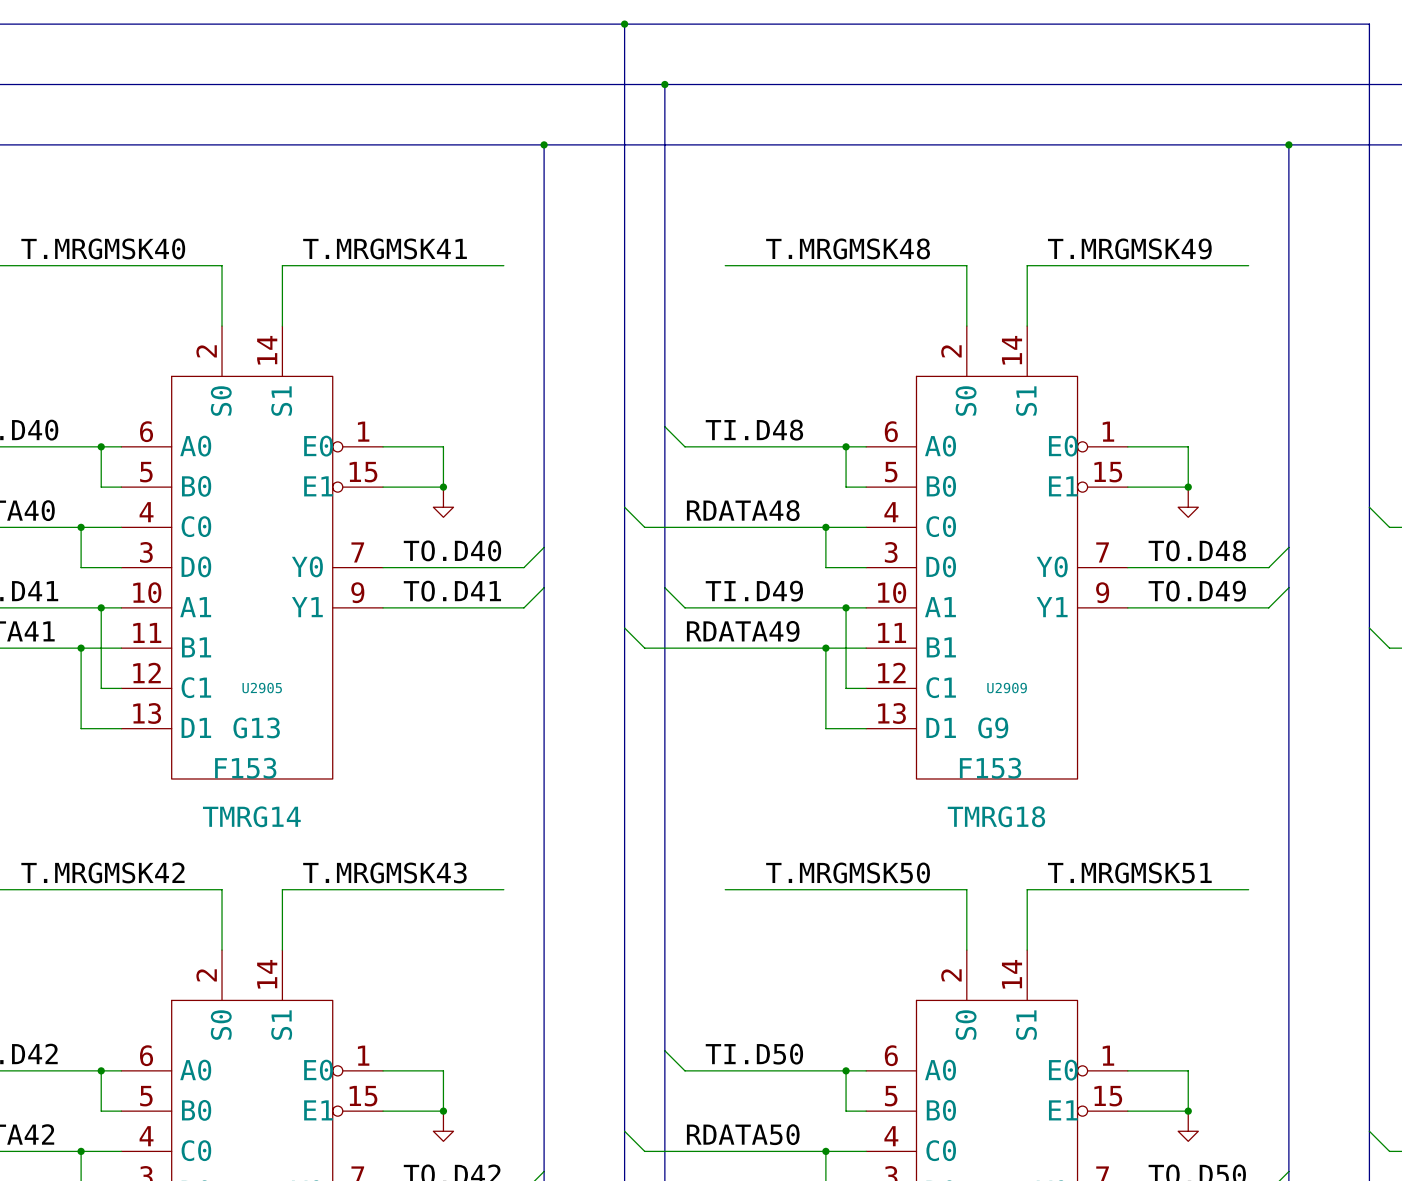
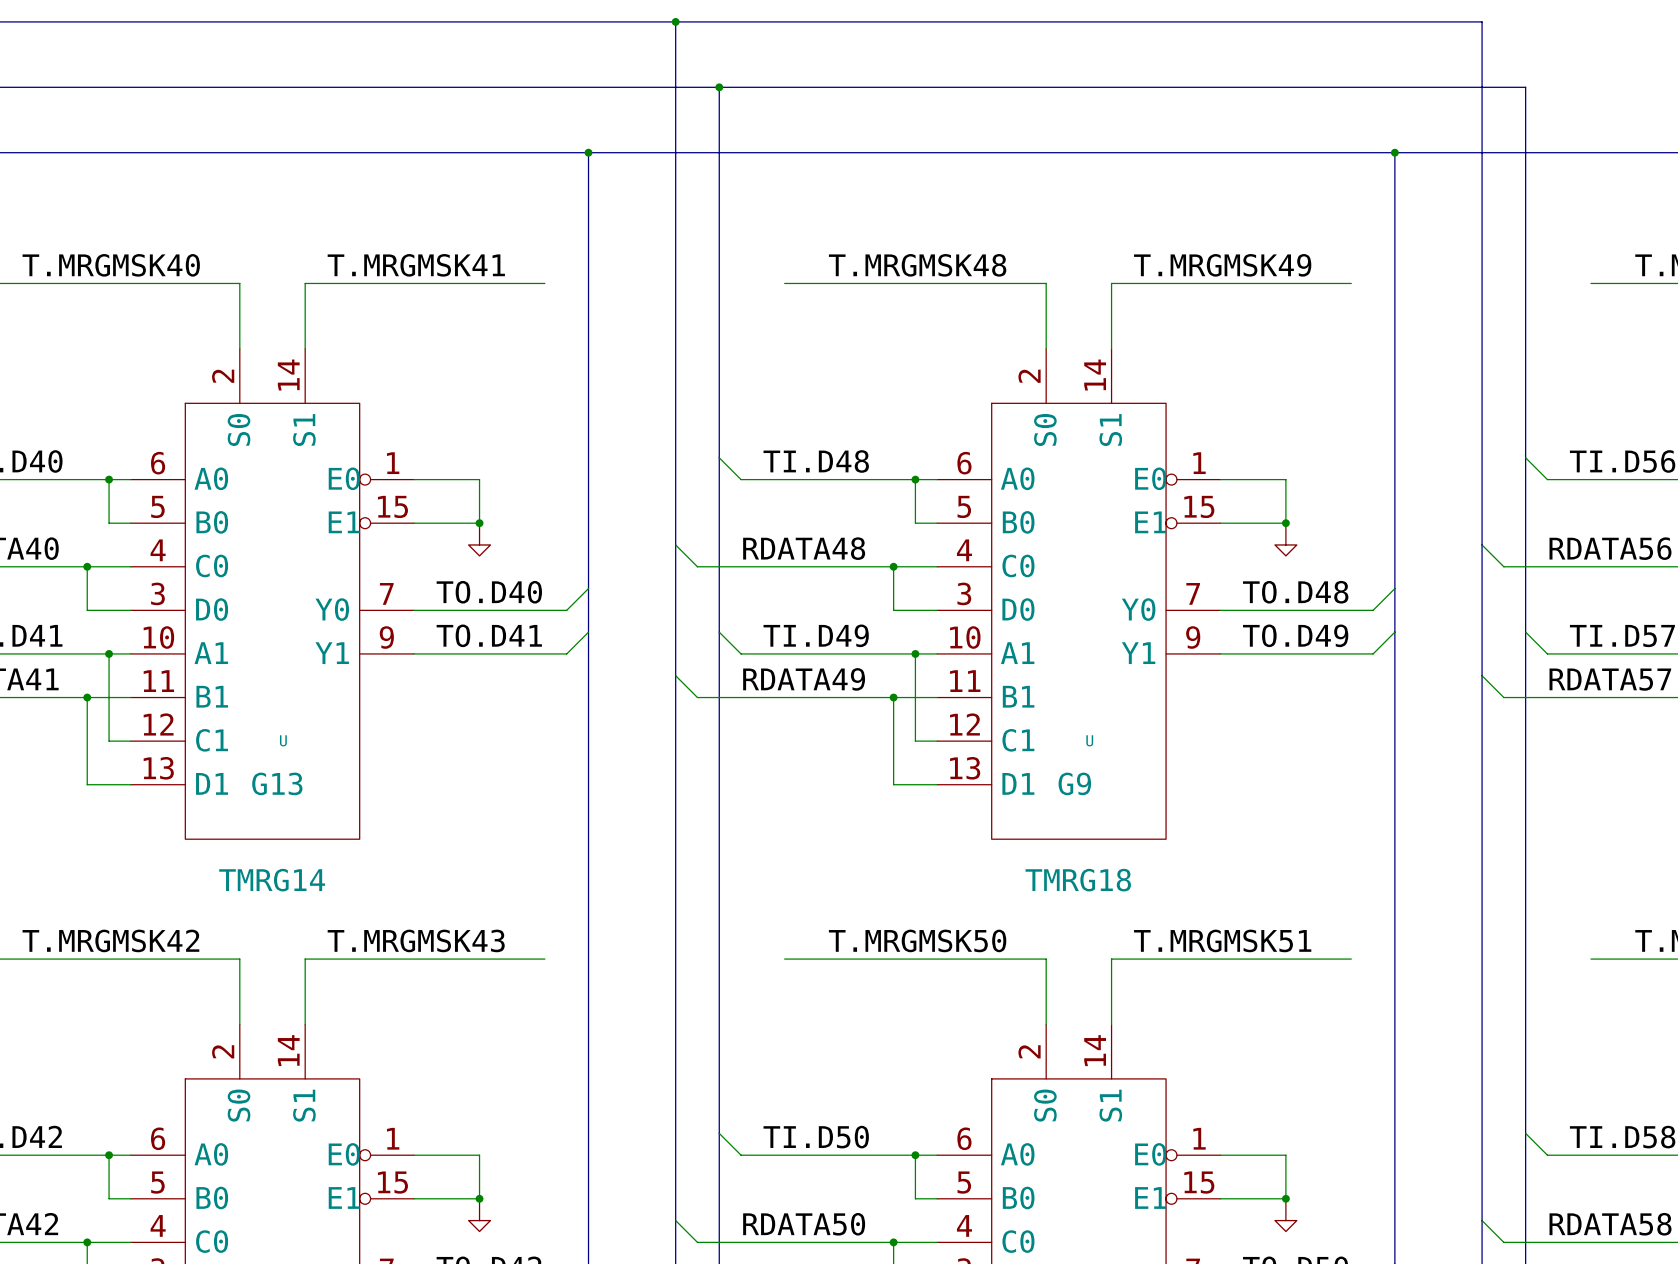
U2905 name: U2905 (262, 688) -> U (283, 740)
U2909 name: U2909 (1007, 688) -> U (1089, 740)
U2905 value: F153 (245, 768) -> none
U2909 value: F153 (990, 768) -> none

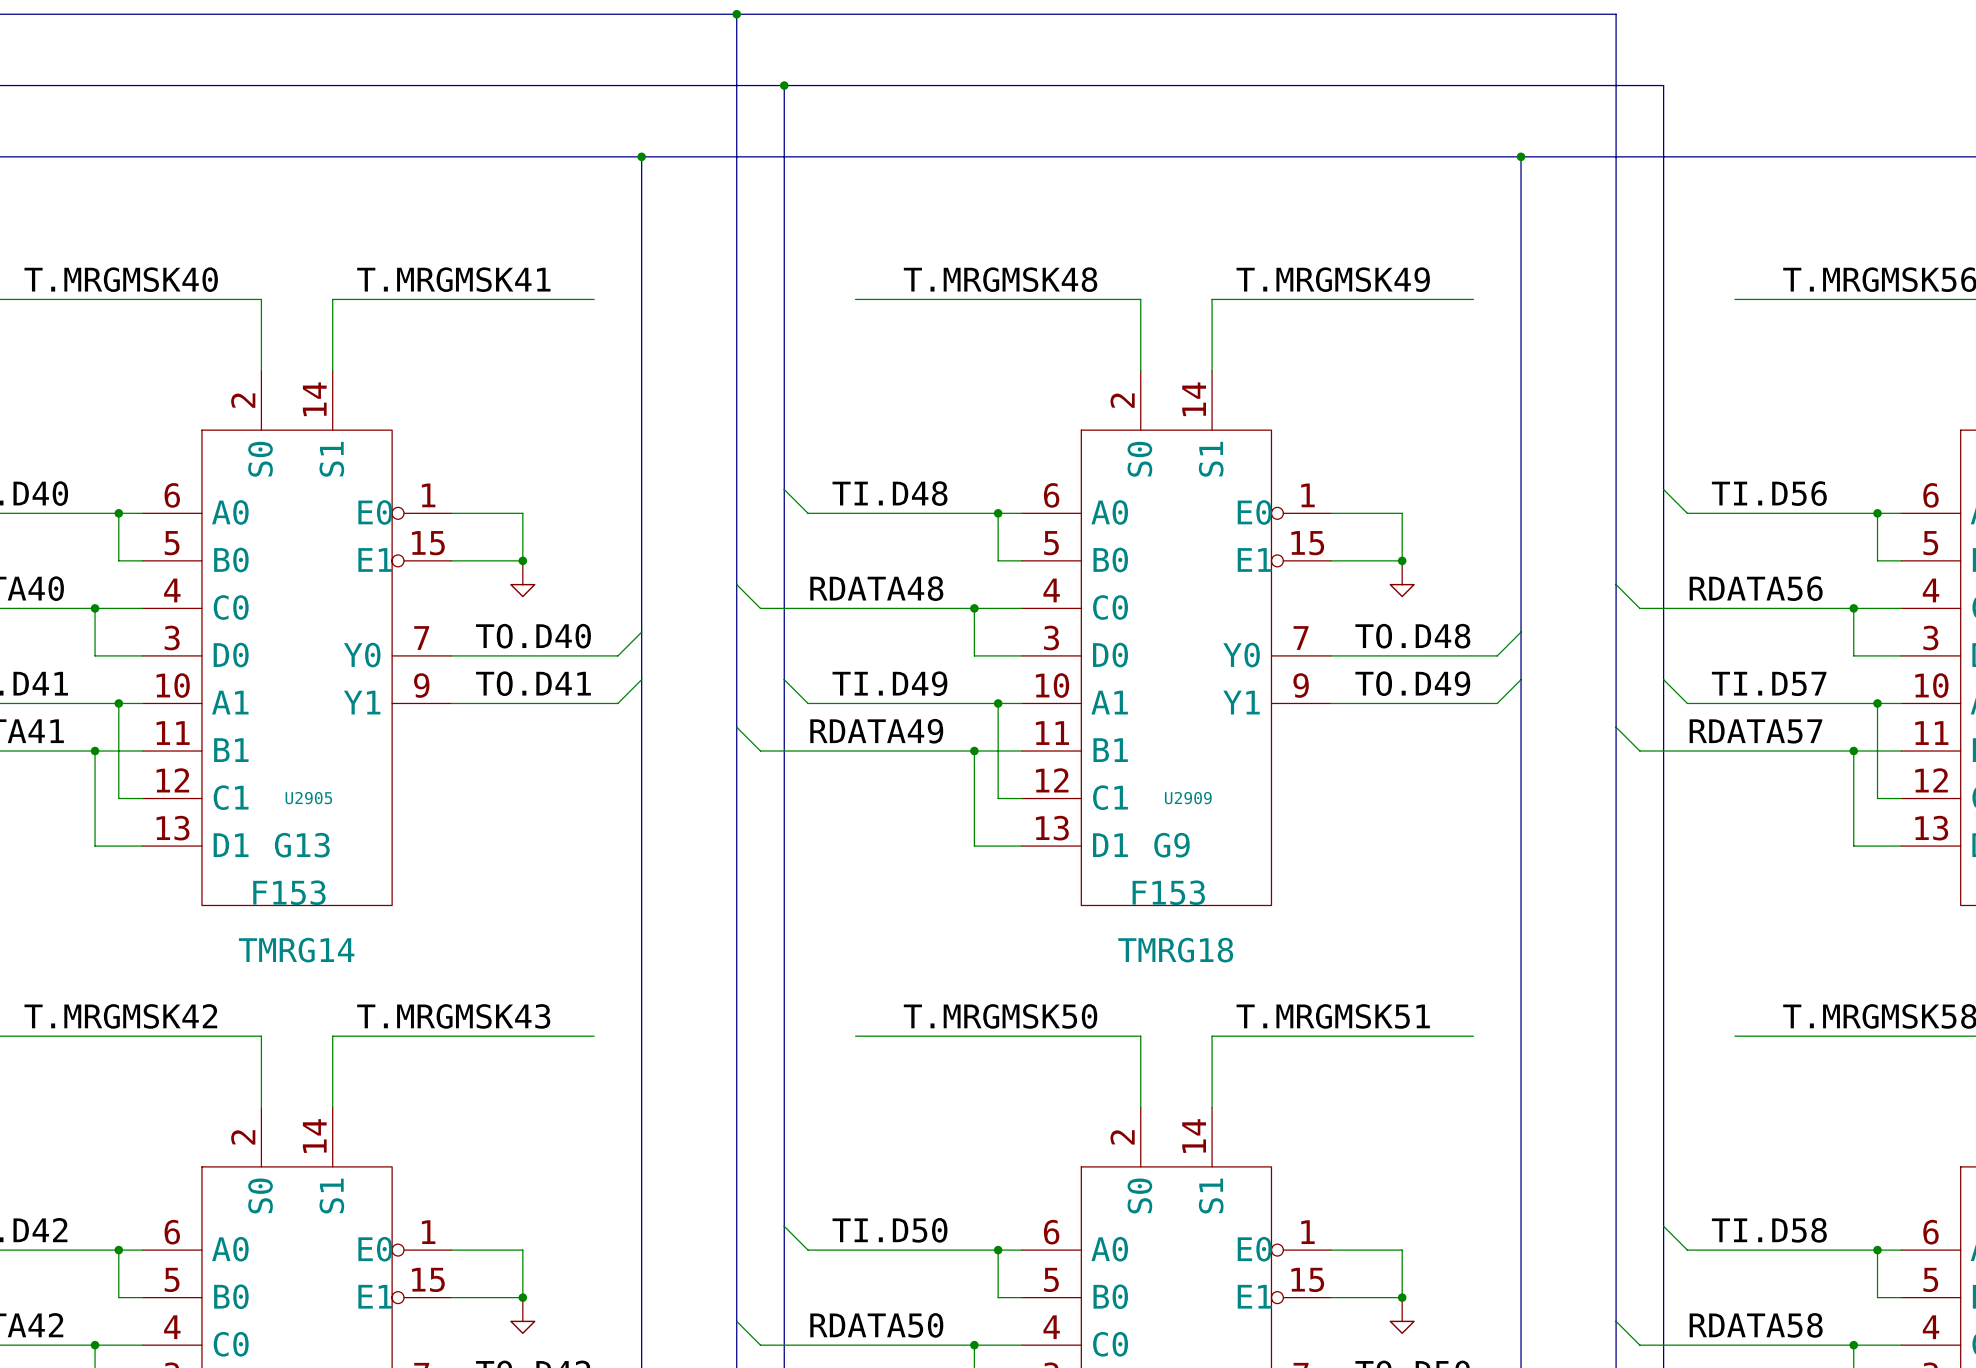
U name: U (283, 740) -> U2905 (308, 798)
U name: U (1089, 740) -> U2909 (1188, 798)
U value: none -> F153 (289, 892)
U value: none -> F153 (1168, 892)

